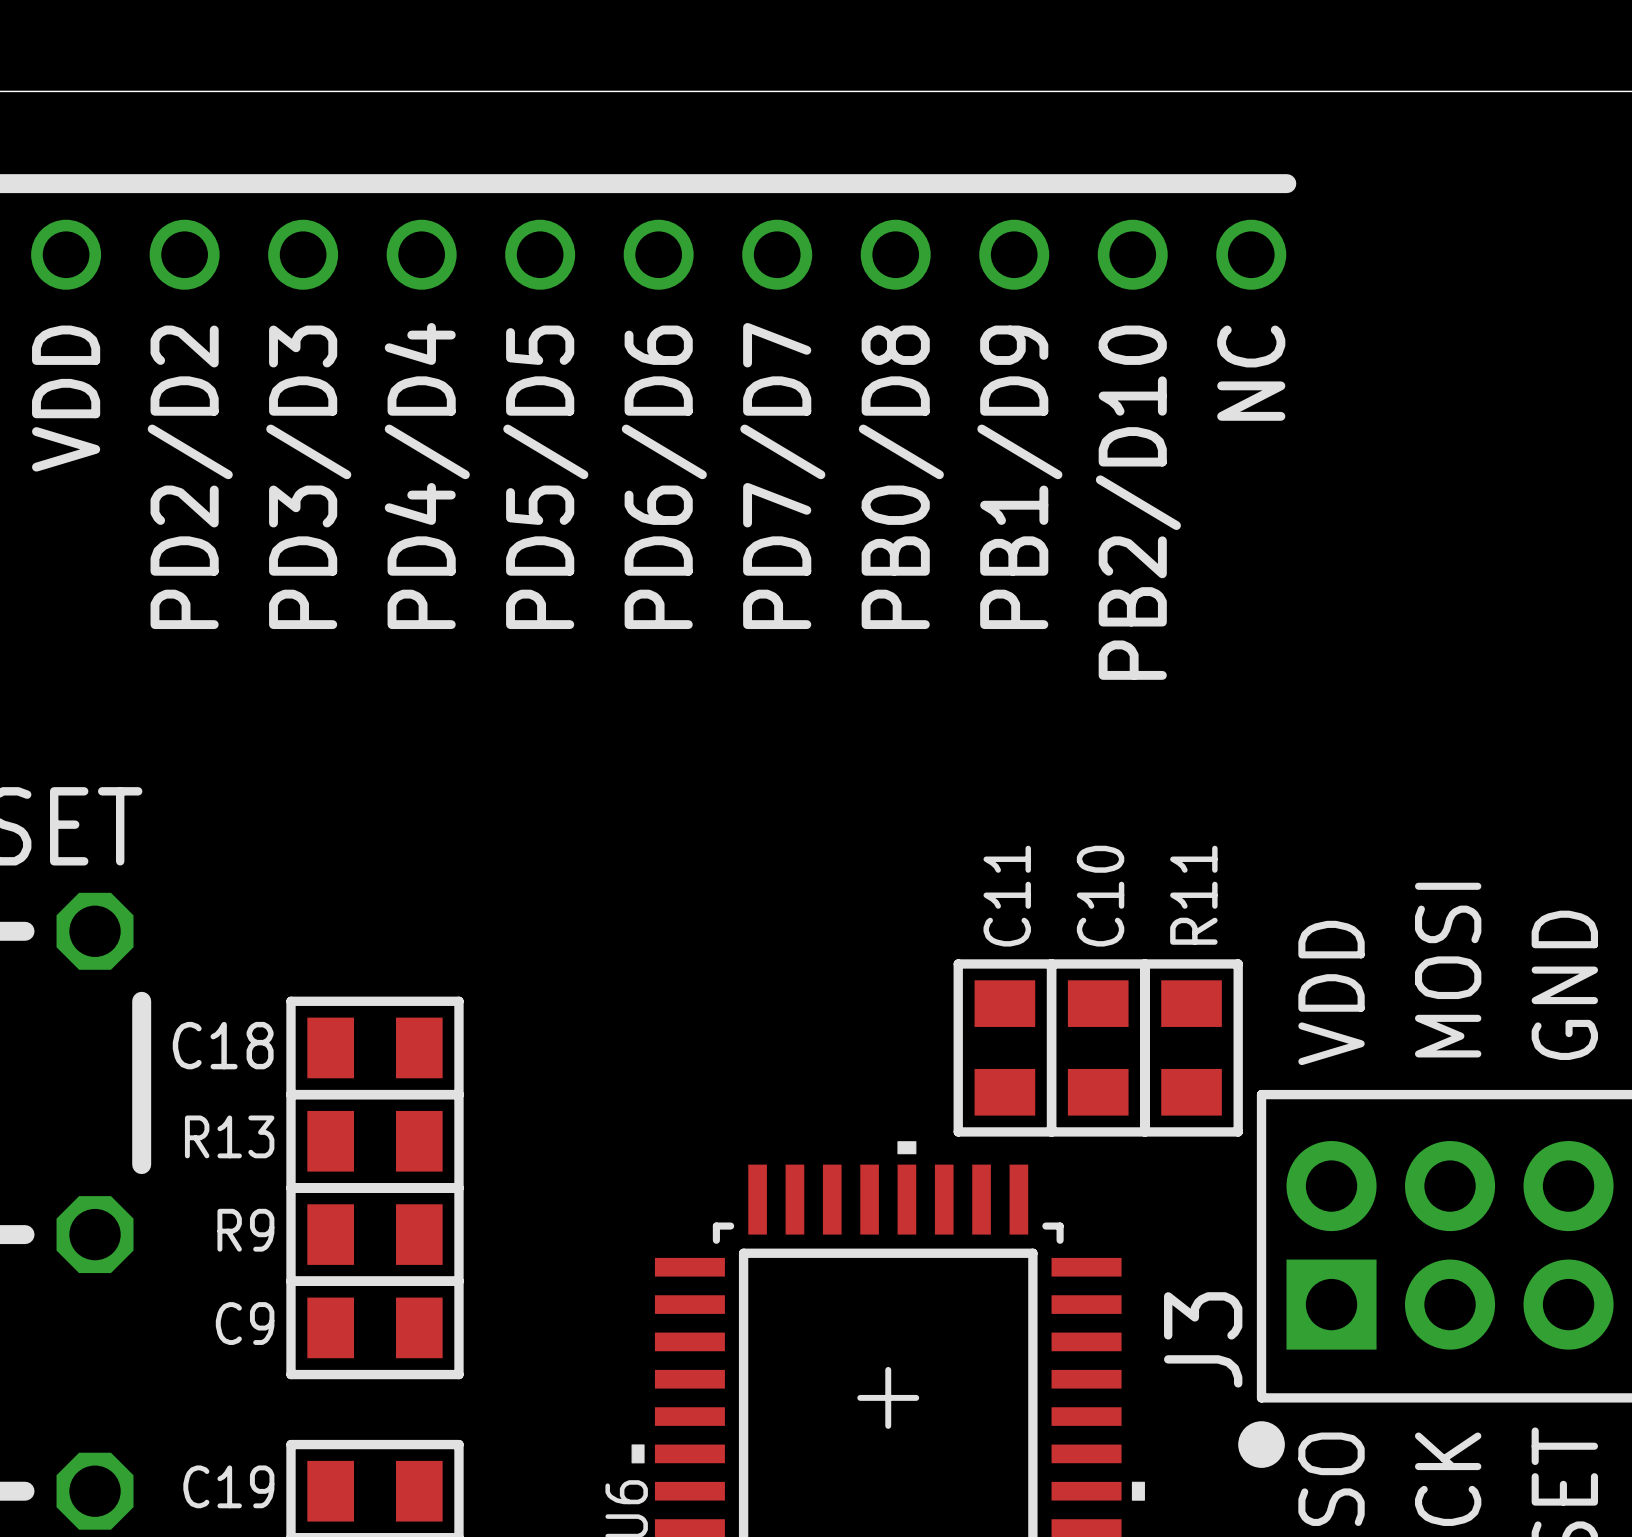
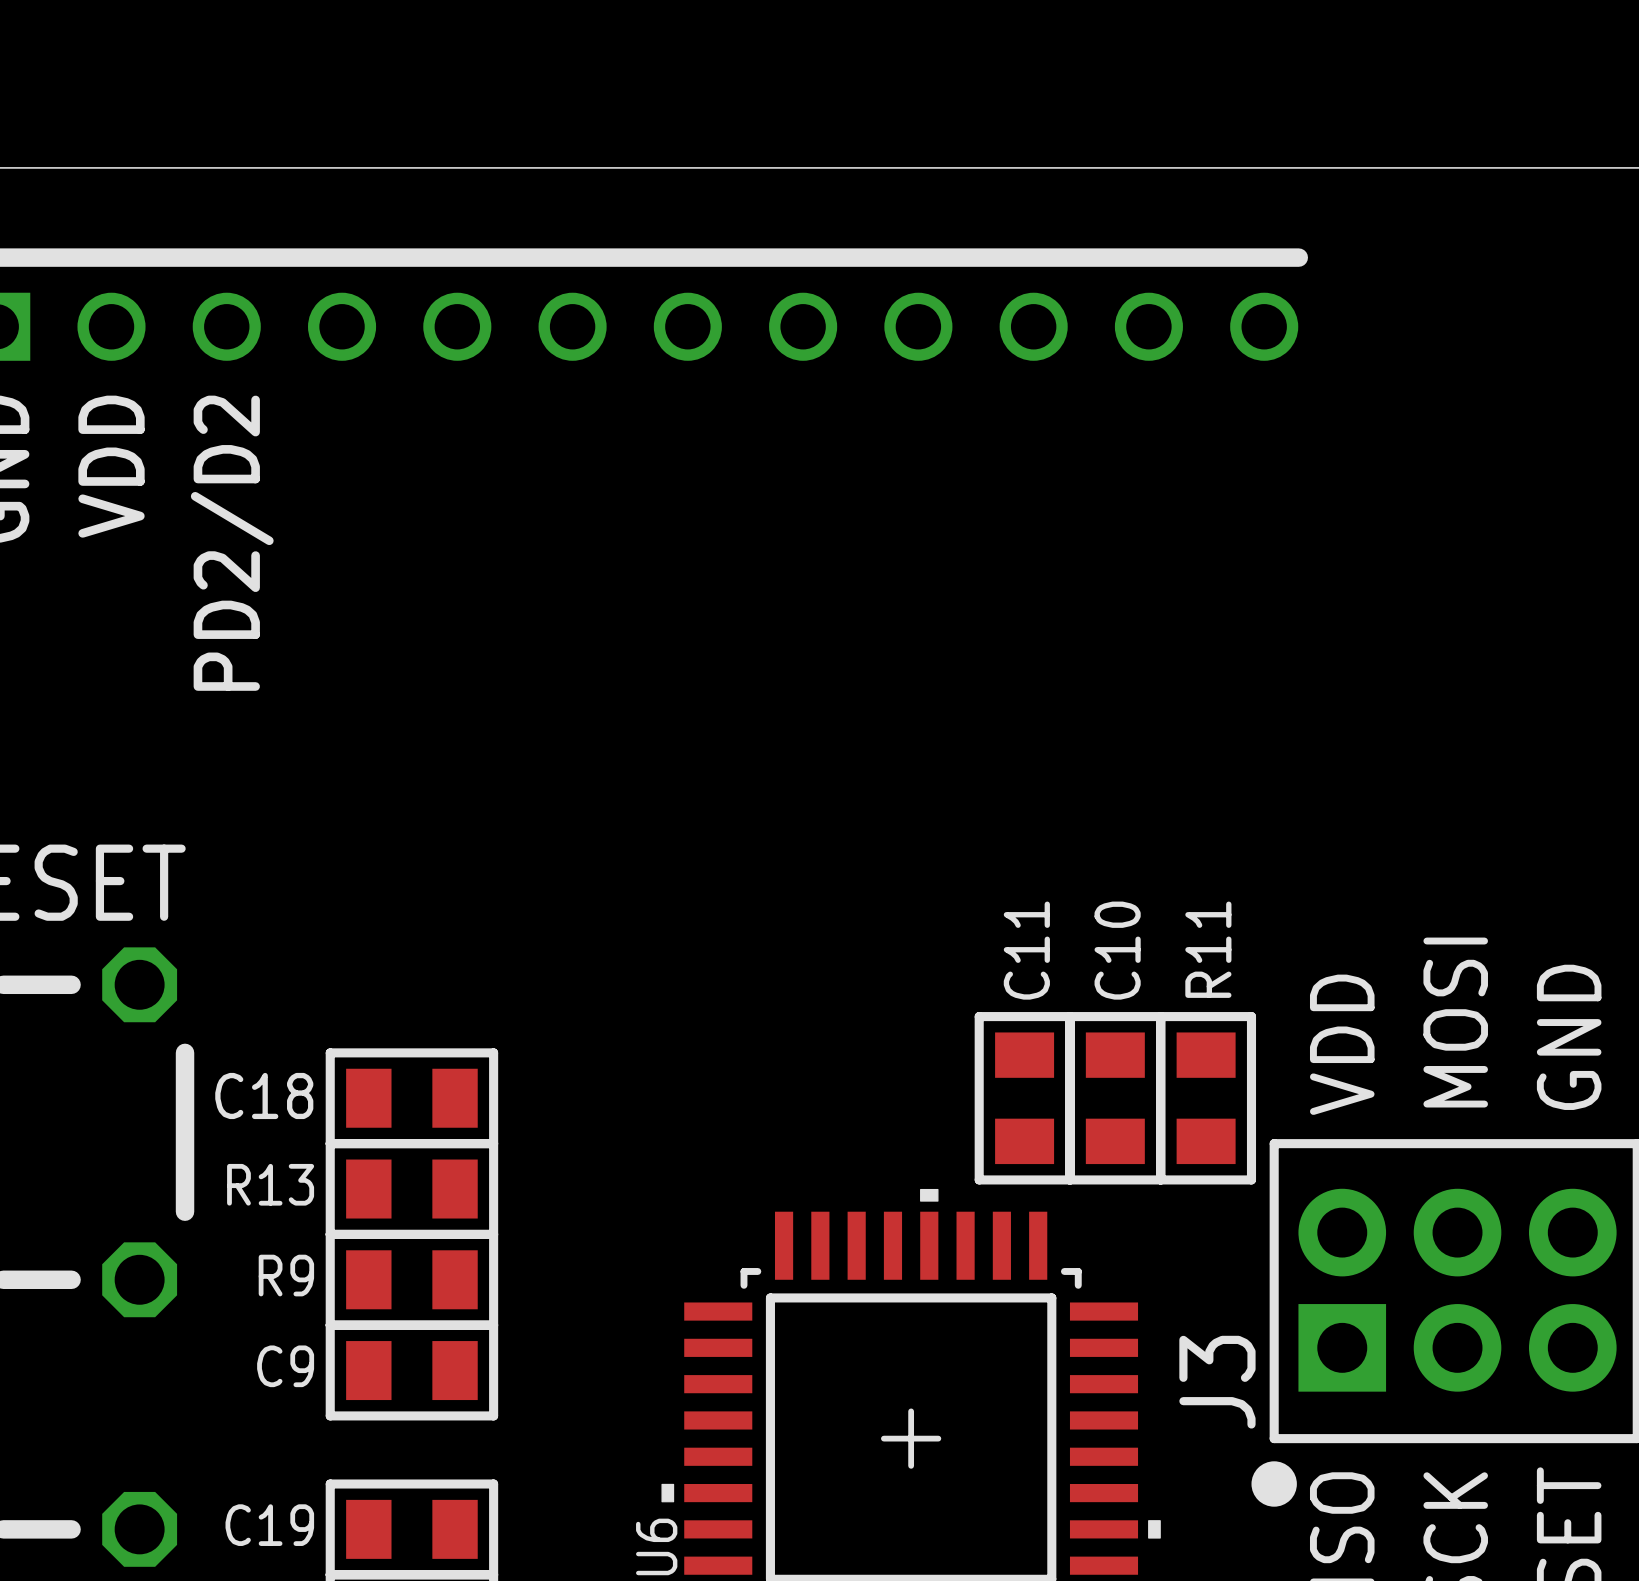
part text: NC (1251, 373) -> none
part text: PD4/D4 (427, 476) -> none
part text: PD7/D7 (782, 476) -> none
part text: PD3/D3 (308, 477) -> none
part text: PD5/D5 (545, 477) -> none
part text: PD6/D6 (664, 477) -> none
part text: PB0/D8 (901, 477) -> none
part text: PB1/D9 (1019, 477) -> none
part text: PB2/D10 (1138, 502) -> none

